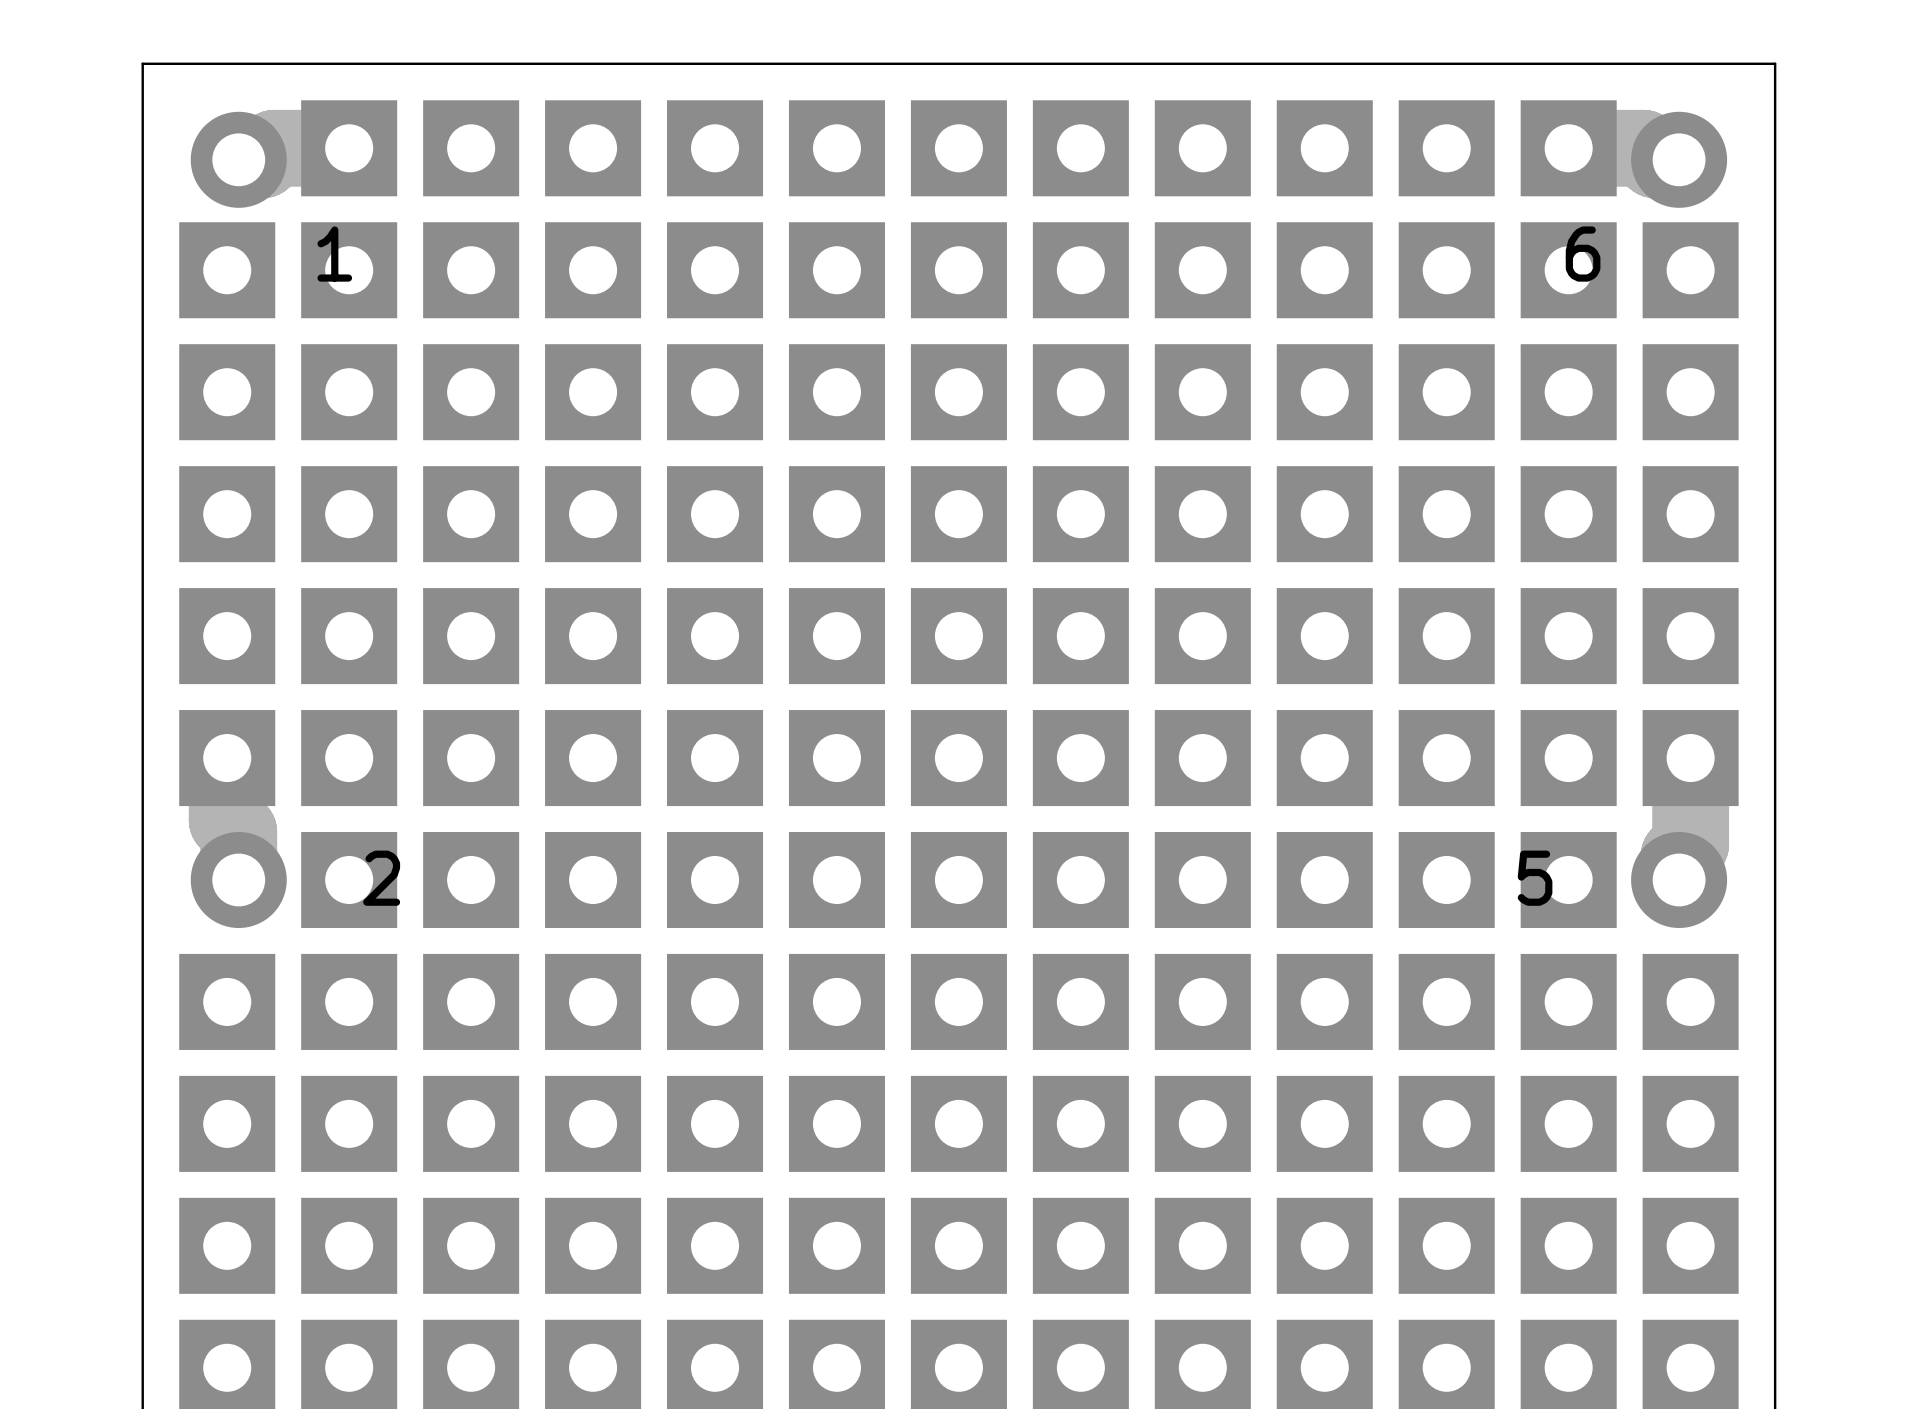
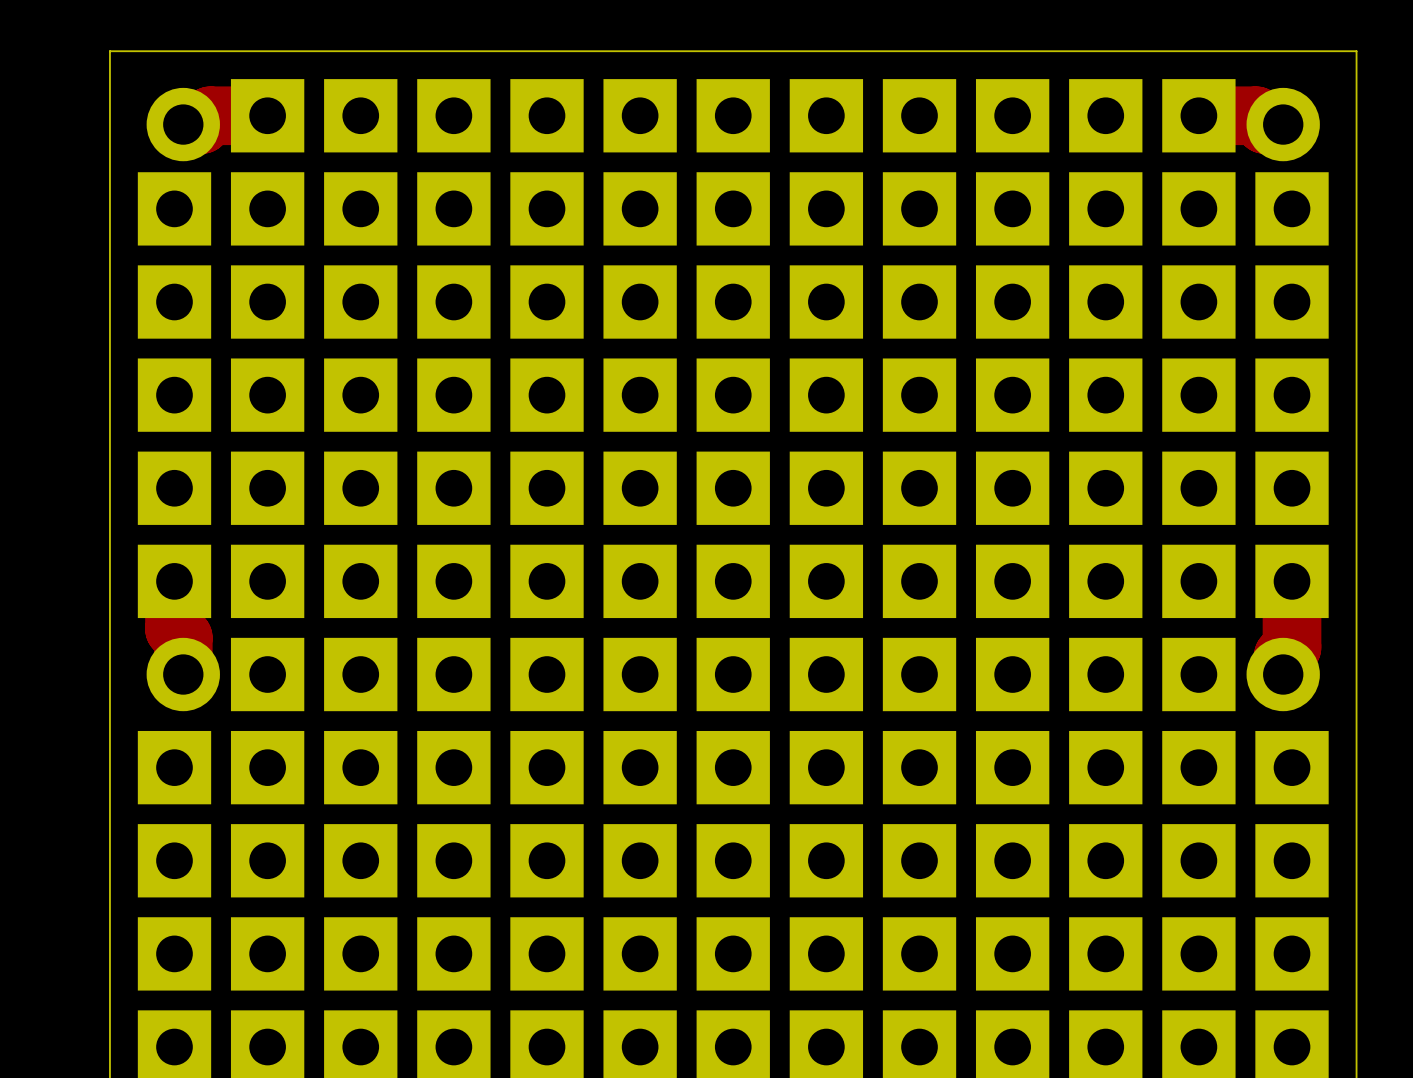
part value: 1 (334, 254) -> none
part value: 6 (1583, 254) -> none
part value: 2 (381, 878) -> none
part value: 5 (1535, 878) -> none

